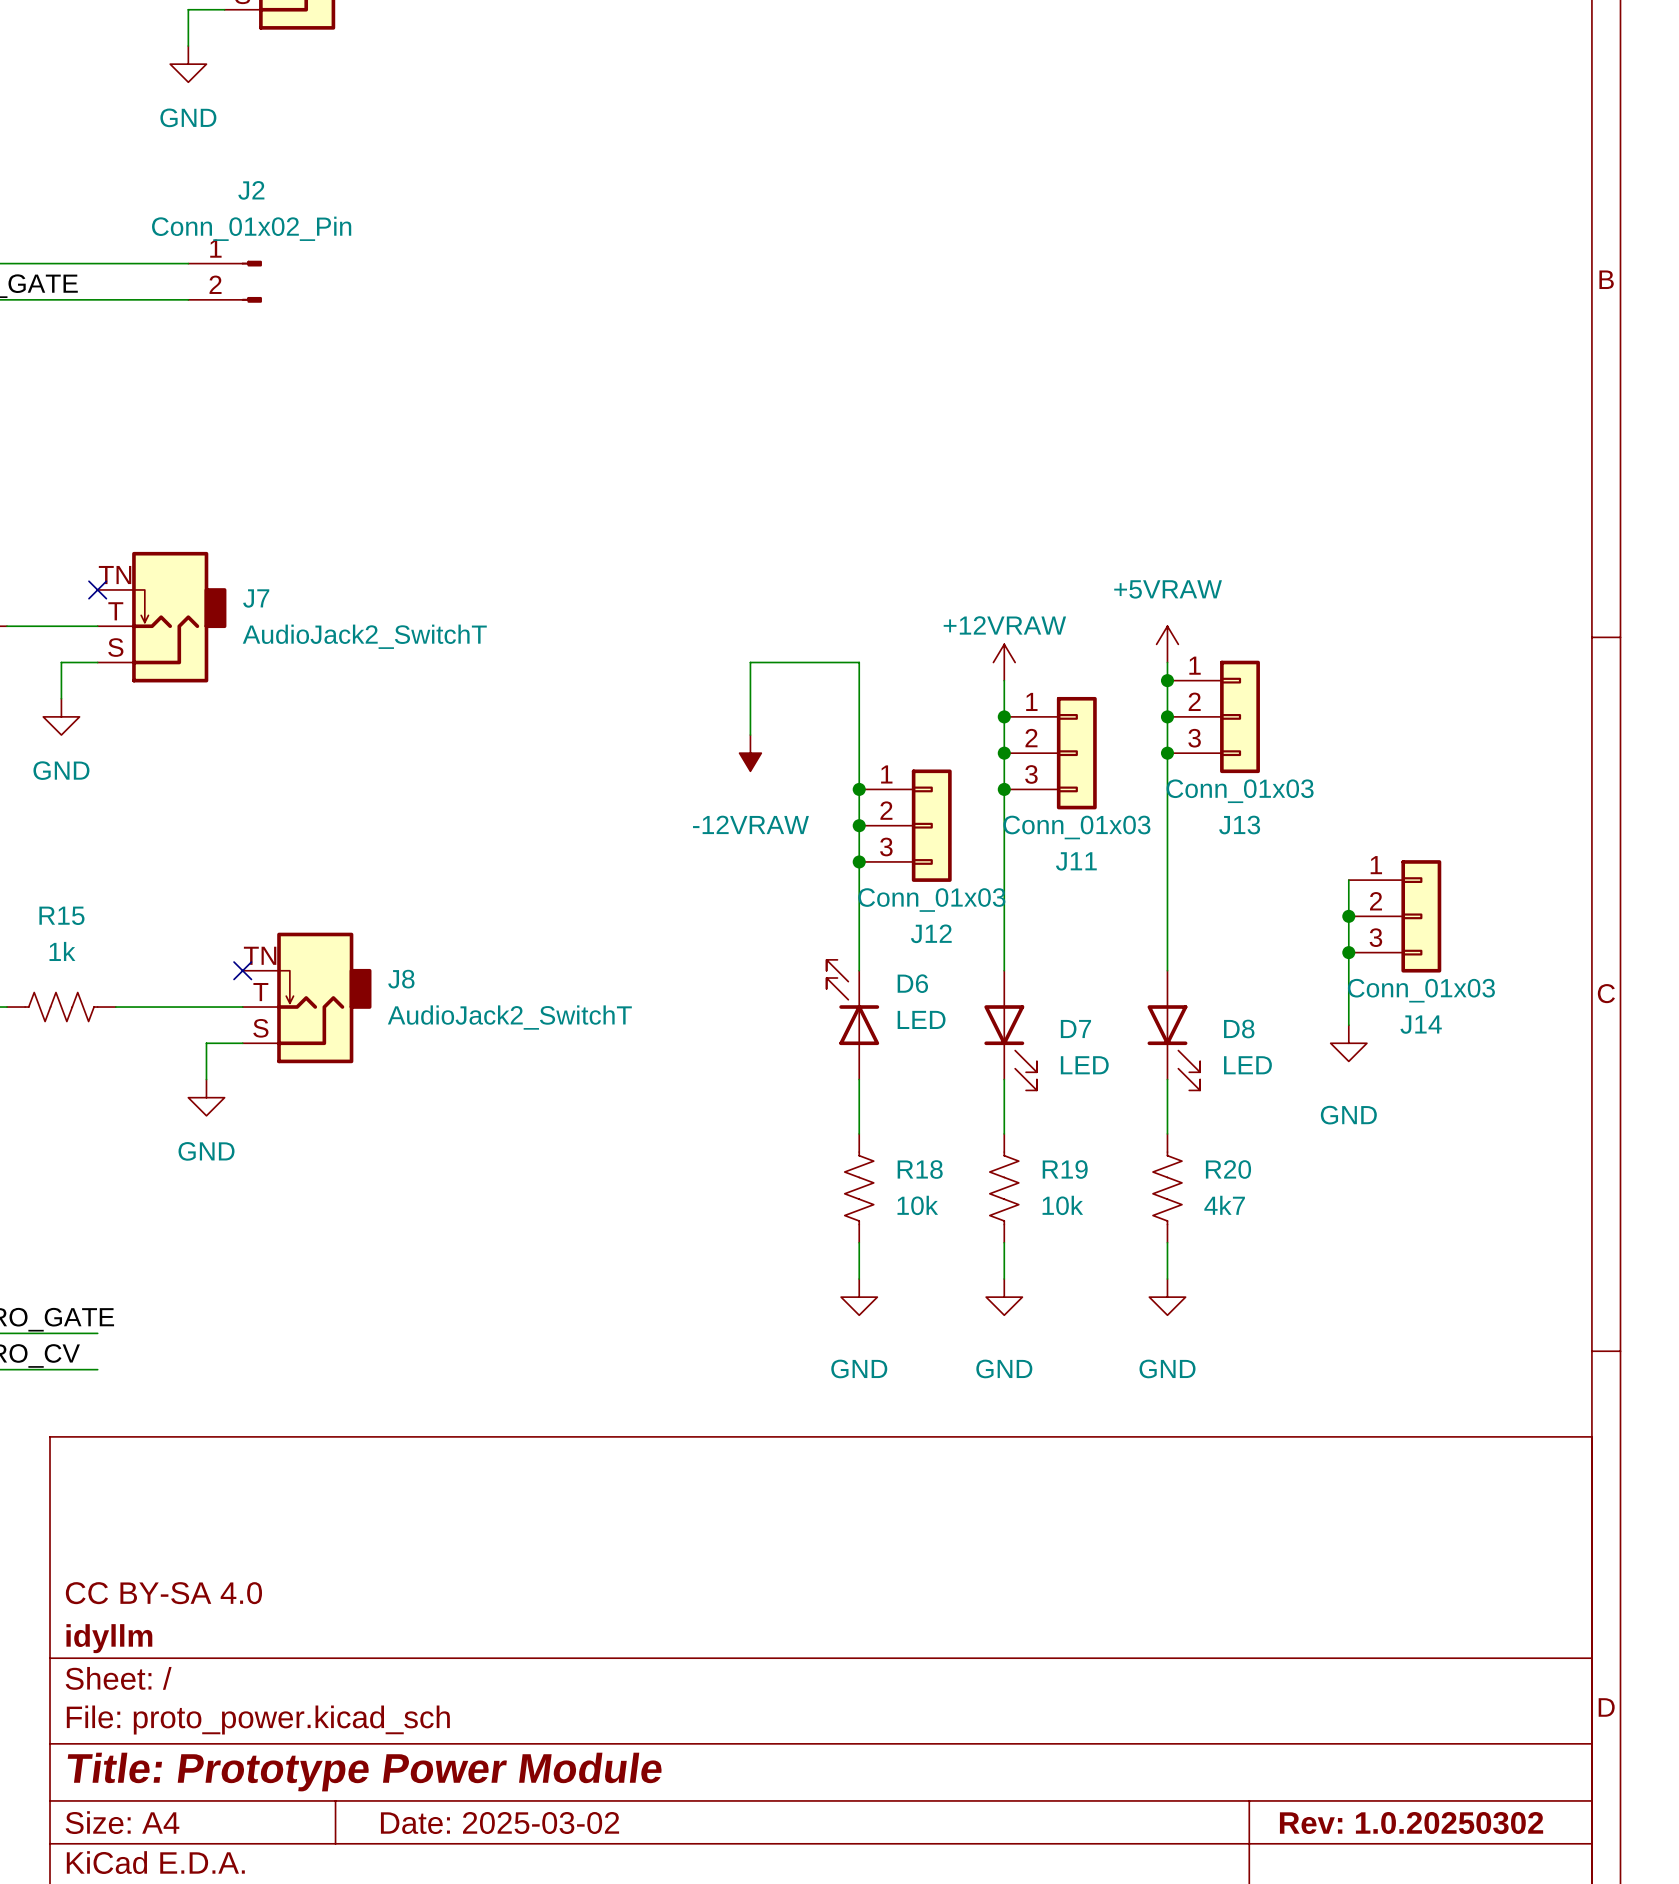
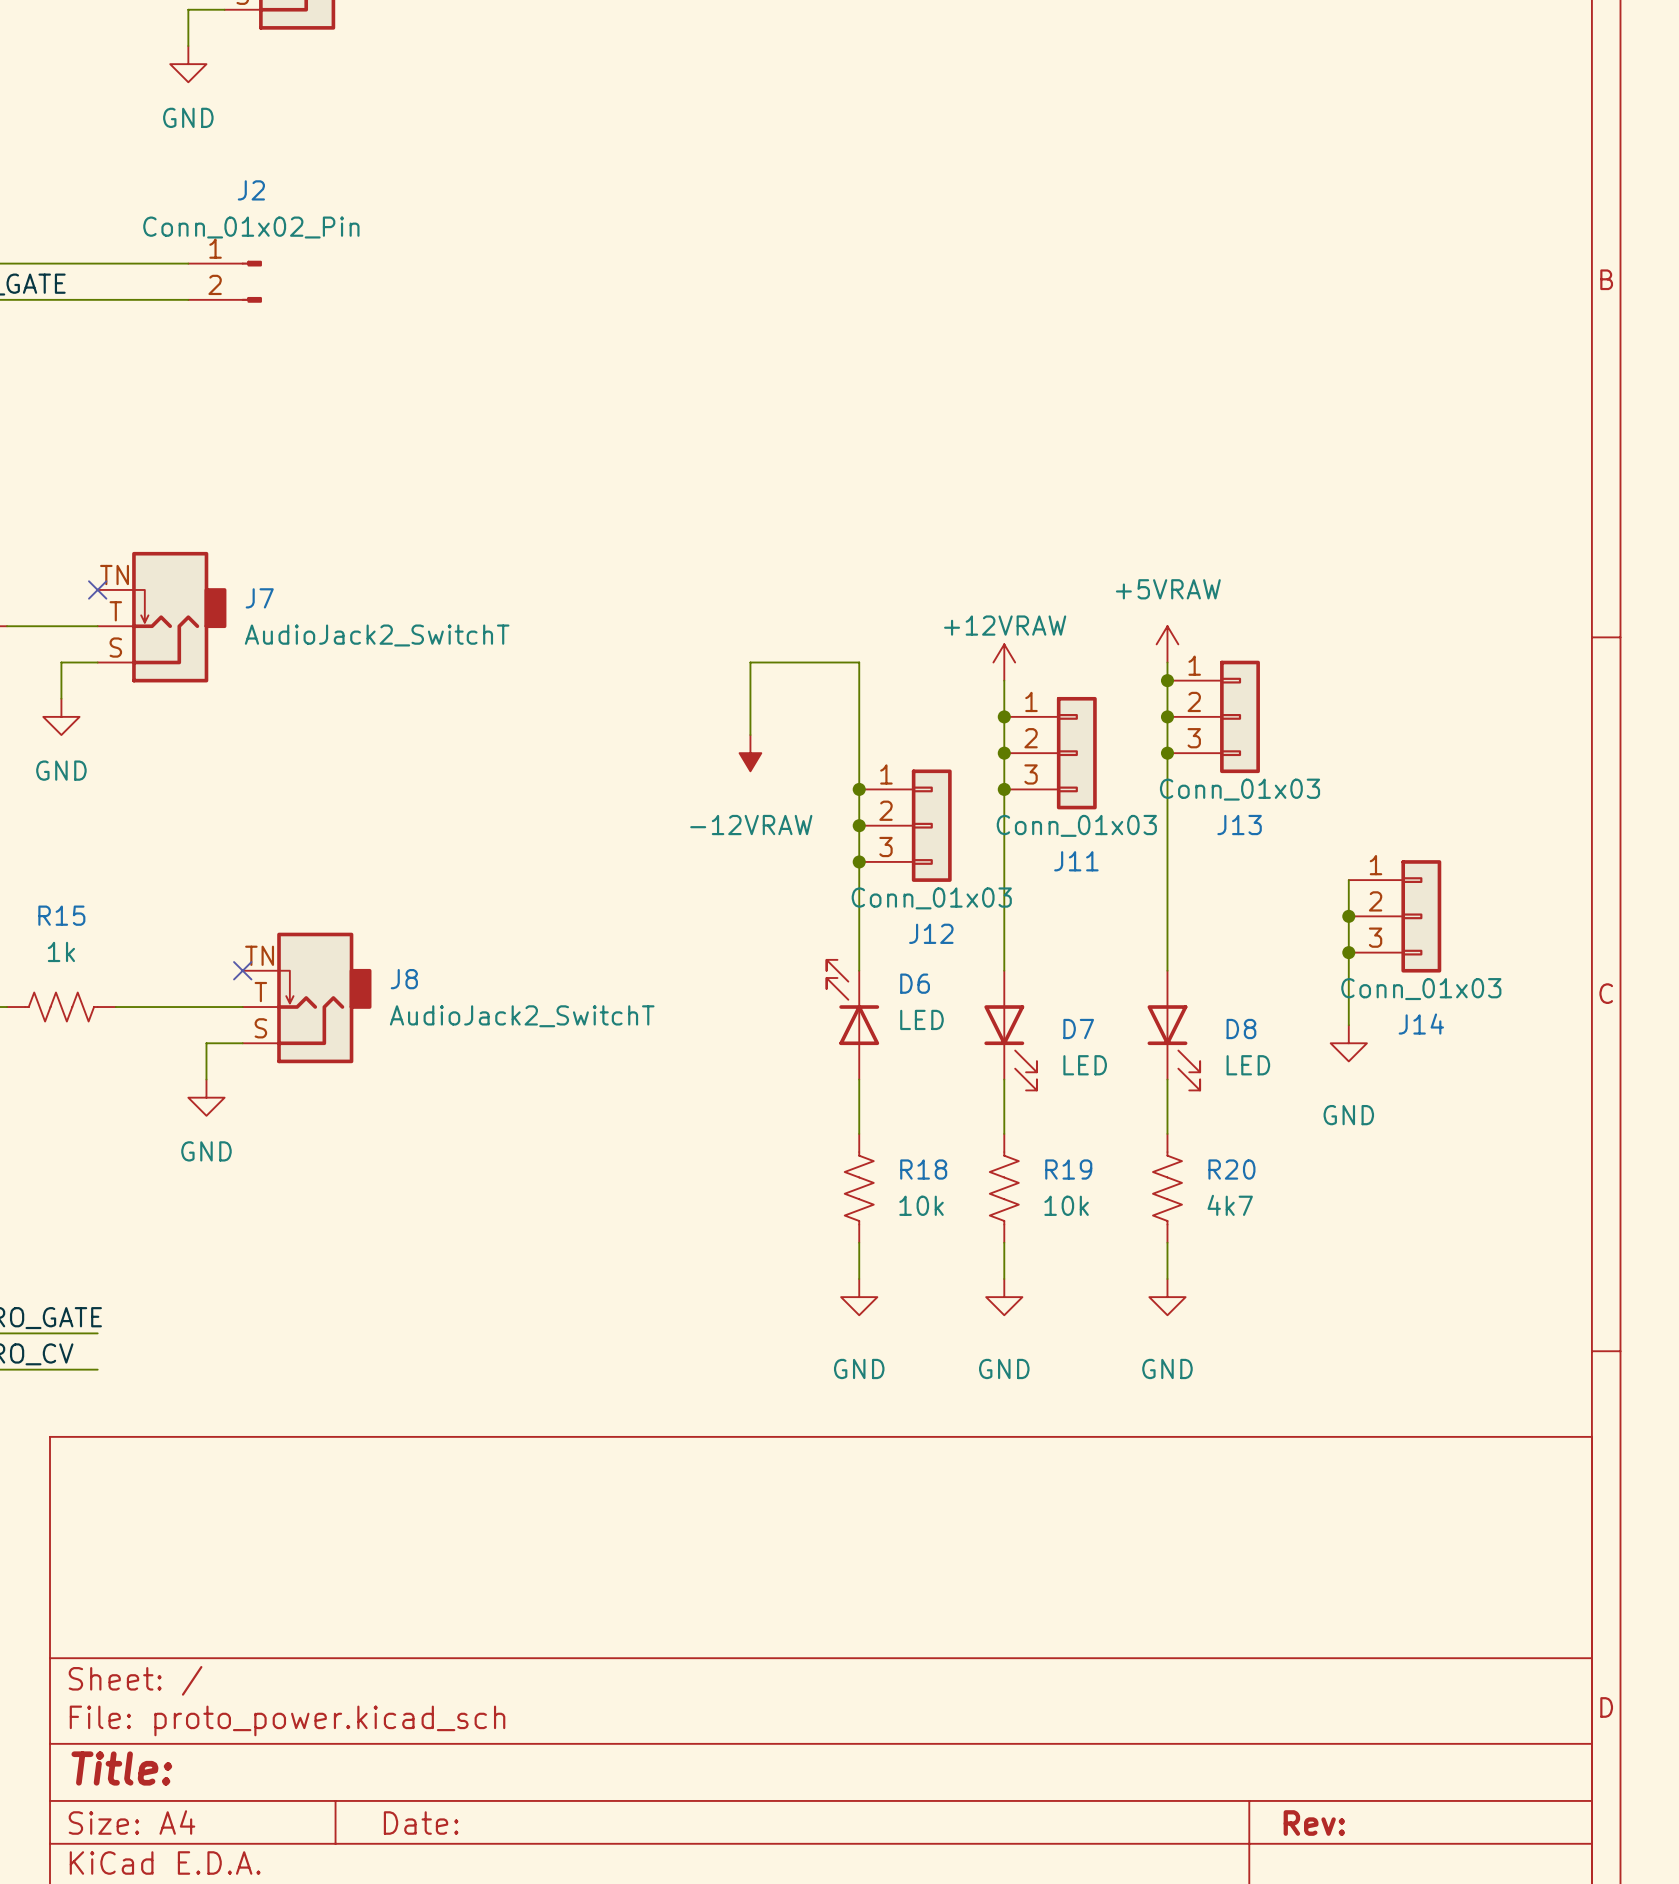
title block: CC BY-SA 4.0 (163, 1593) -> none
title block: idyllm (109, 1638) -> none
title block: Title: Prototype Power Module (364, 1772) -> Title: (121, 1768)
title block: Date: 2025-03-02 (500, 1823) -> Date: (421, 1823)
title block: Rev: 1.0.20250302 (1411, 1823) -> Rev: (1314, 1823)

